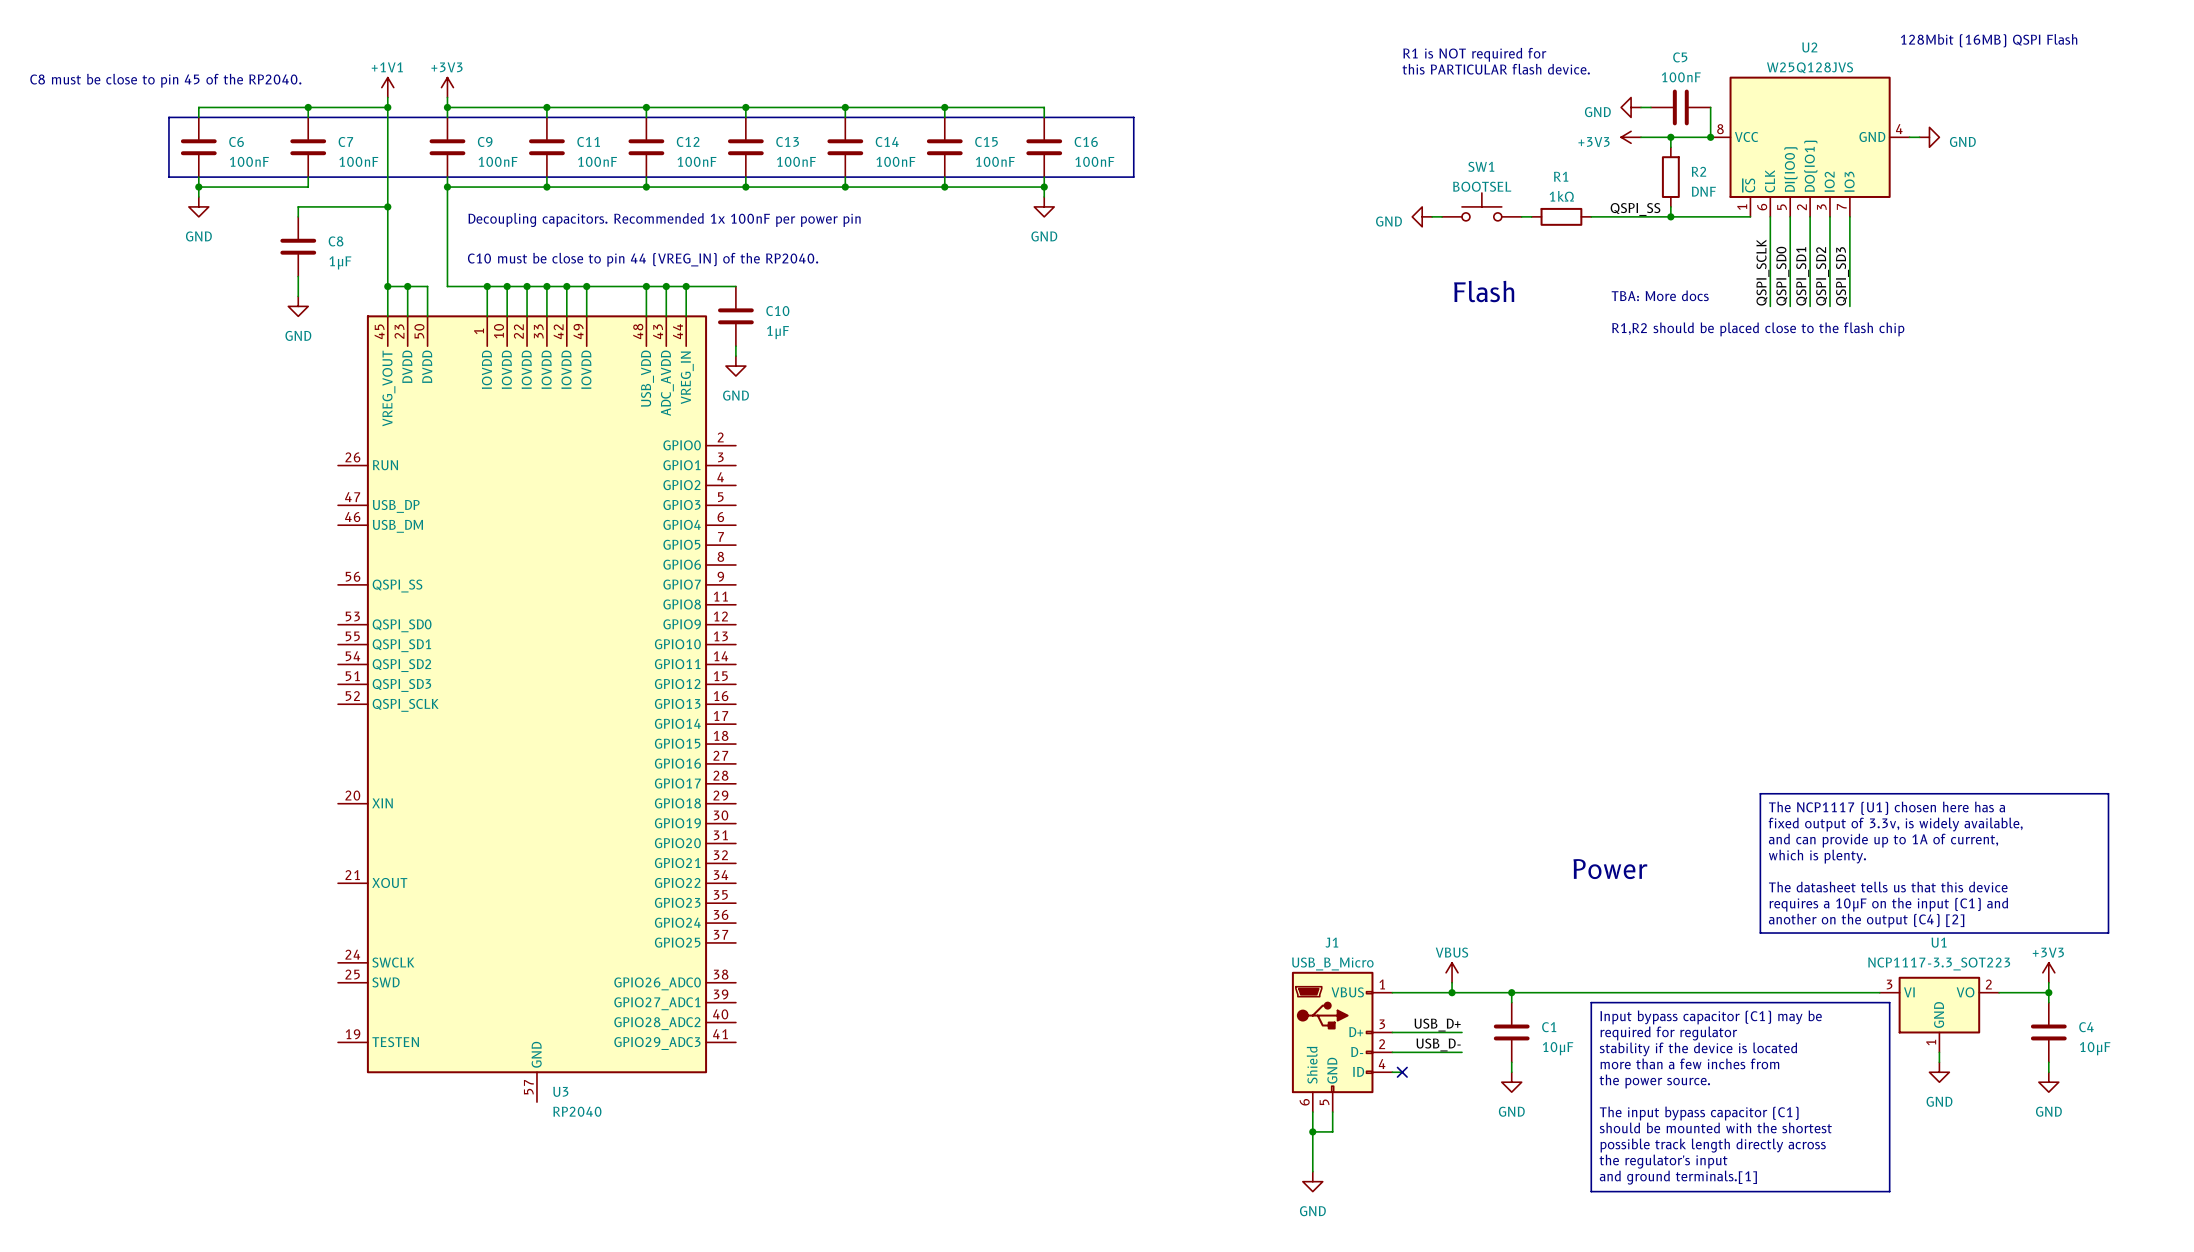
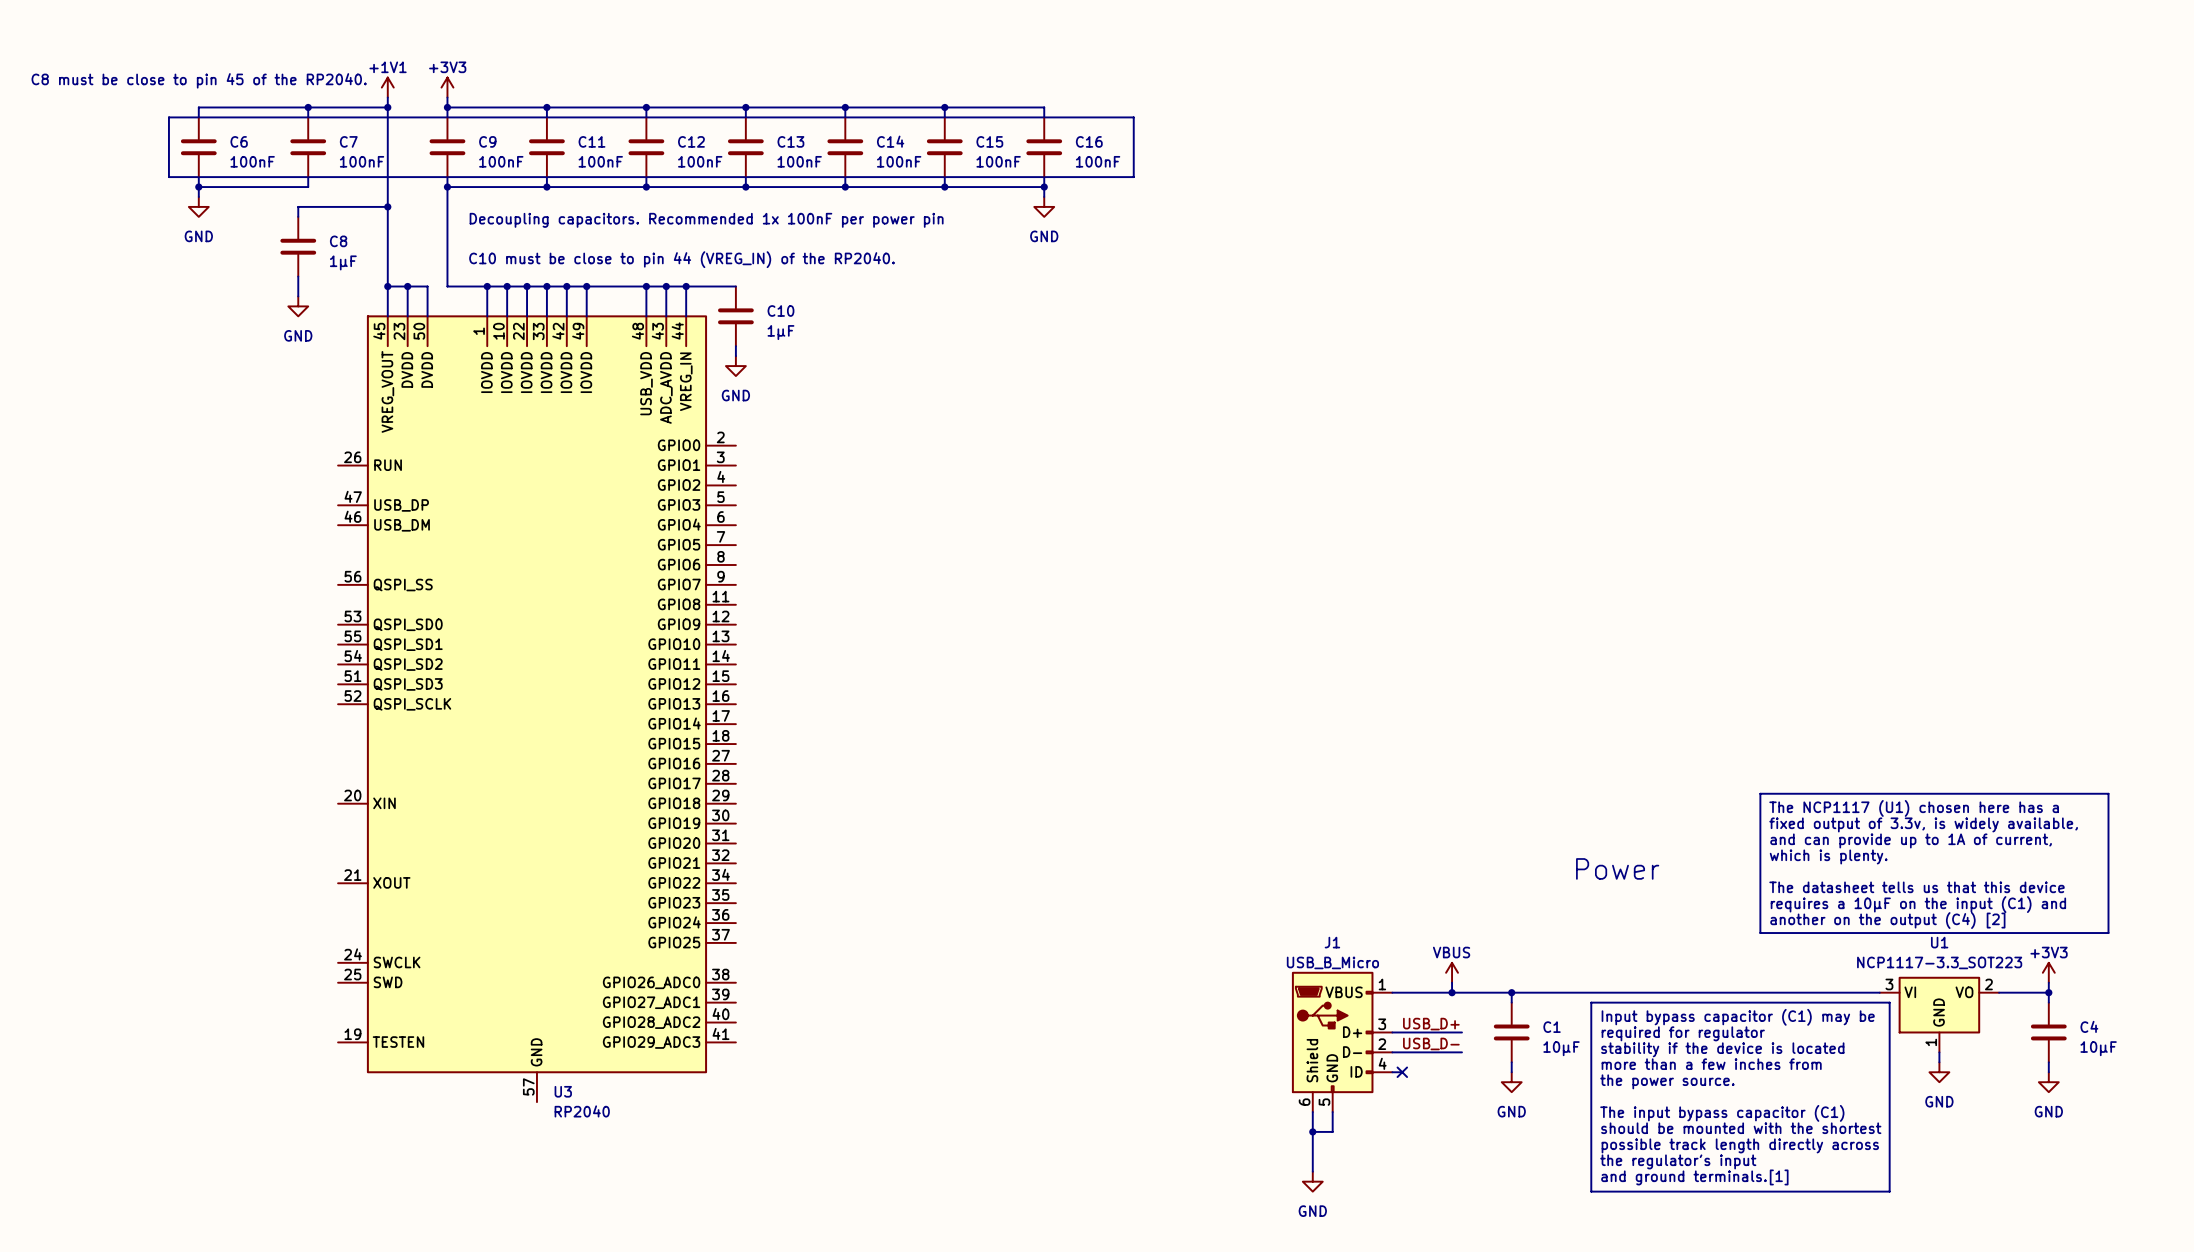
text: 128Mbit (16MB) QSPI Flash (1989, 40) -> none
text: R1 is NOT required for (1474, 54) -> none
text: this PARTICULAR flash device. (1496, 69) -> none
power symbol: GND (1631, 107) -> none
wire: (1641, 107) (1650, 107) -> none
C5: 100nF (1680, 107) -> none
wire: (1710, 107) (1710, 137) (1641, 137) -> none
power symbol: +3V3 (1631, 137) -> none
wire: (1670, 137) (1670, 147) -> none
junction: (1670, 137) -> none
junction: (1710, 137) -> none
wire: (1909, 137) (1919, 137) -> none
power symbol: GND (1929, 137) -> none
U2: W25Q128JVS (1810, 146) -> none
R2: DNF (1670, 177) -> none
SW1: BOOTSEL (1481, 206) -> none
wire: (1670, 206) (1670, 216) -> none
label: QSPI_SS (1635, 209) -> none
power symbol: GND (1422, 216) -> none
wire: (1432, 216) (1442, 216) -> none
wire: (1521, 216) (1531, 216) -> none
R1: 1kΩ (1561, 216) -> none
wire: (1591, 216) (1750, 216) -> none
junction: (1670, 216) -> none
wire: (1770, 216) (1770, 306) -> none
wire: (1790, 216) (1790, 306) -> none
wire: (1810, 216) (1810, 306) -> none
wire: (1829, 216) (1829, 306) -> none
wire: (1849, 216) (1849, 306) -> none
label: QSPI_SCLK (1762, 272) -> none
label: QSPI_SD0 (1782, 276) -> none
label: QSPI_SD1 (1802, 276) -> none
label: QSPI_SD2 (1822, 276) -> none
label: QSPI_SD3 (1842, 276) -> none
text: Flash (1484, 291) -> none
text: TBA: More docs (1660, 295) -> none
text: R1,R2 should be placed close to the flash chip (1758, 329) -> none

